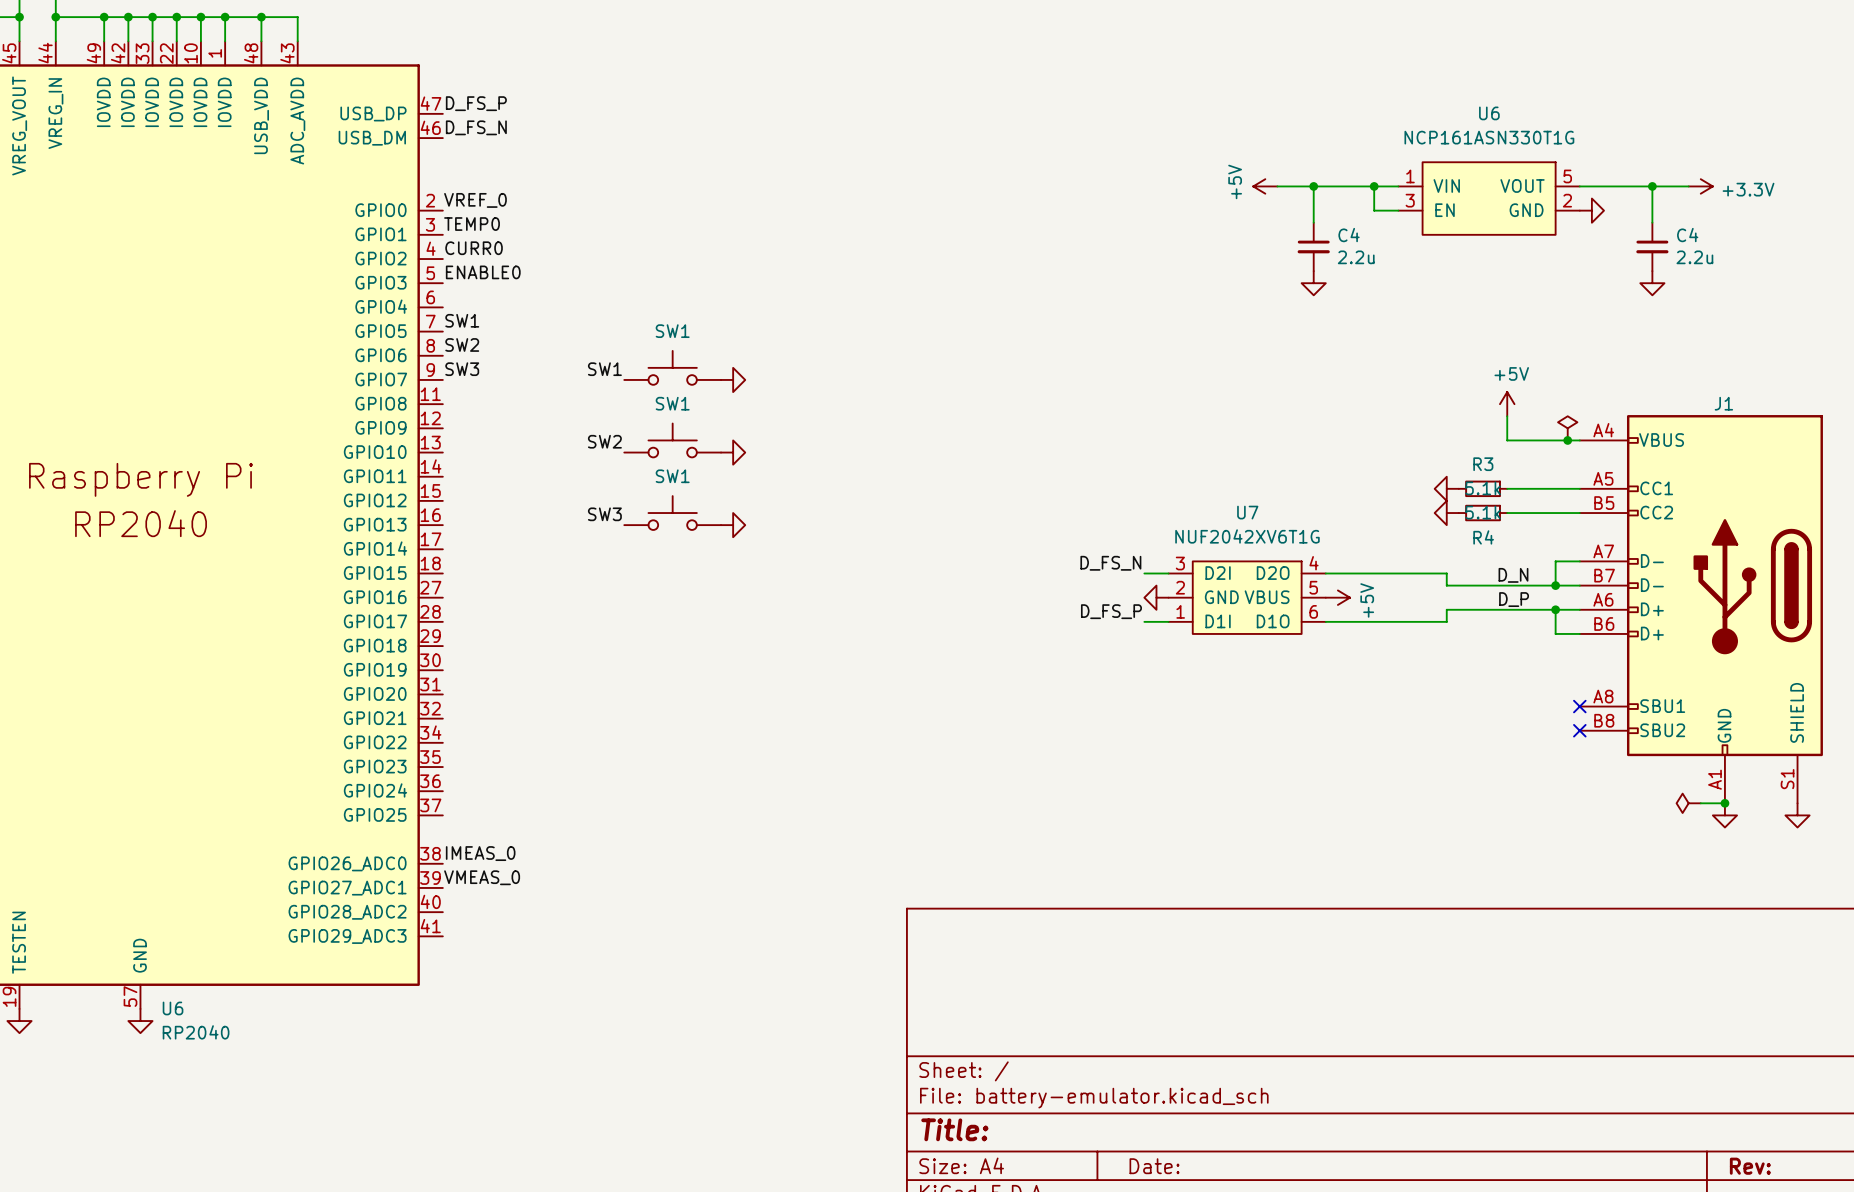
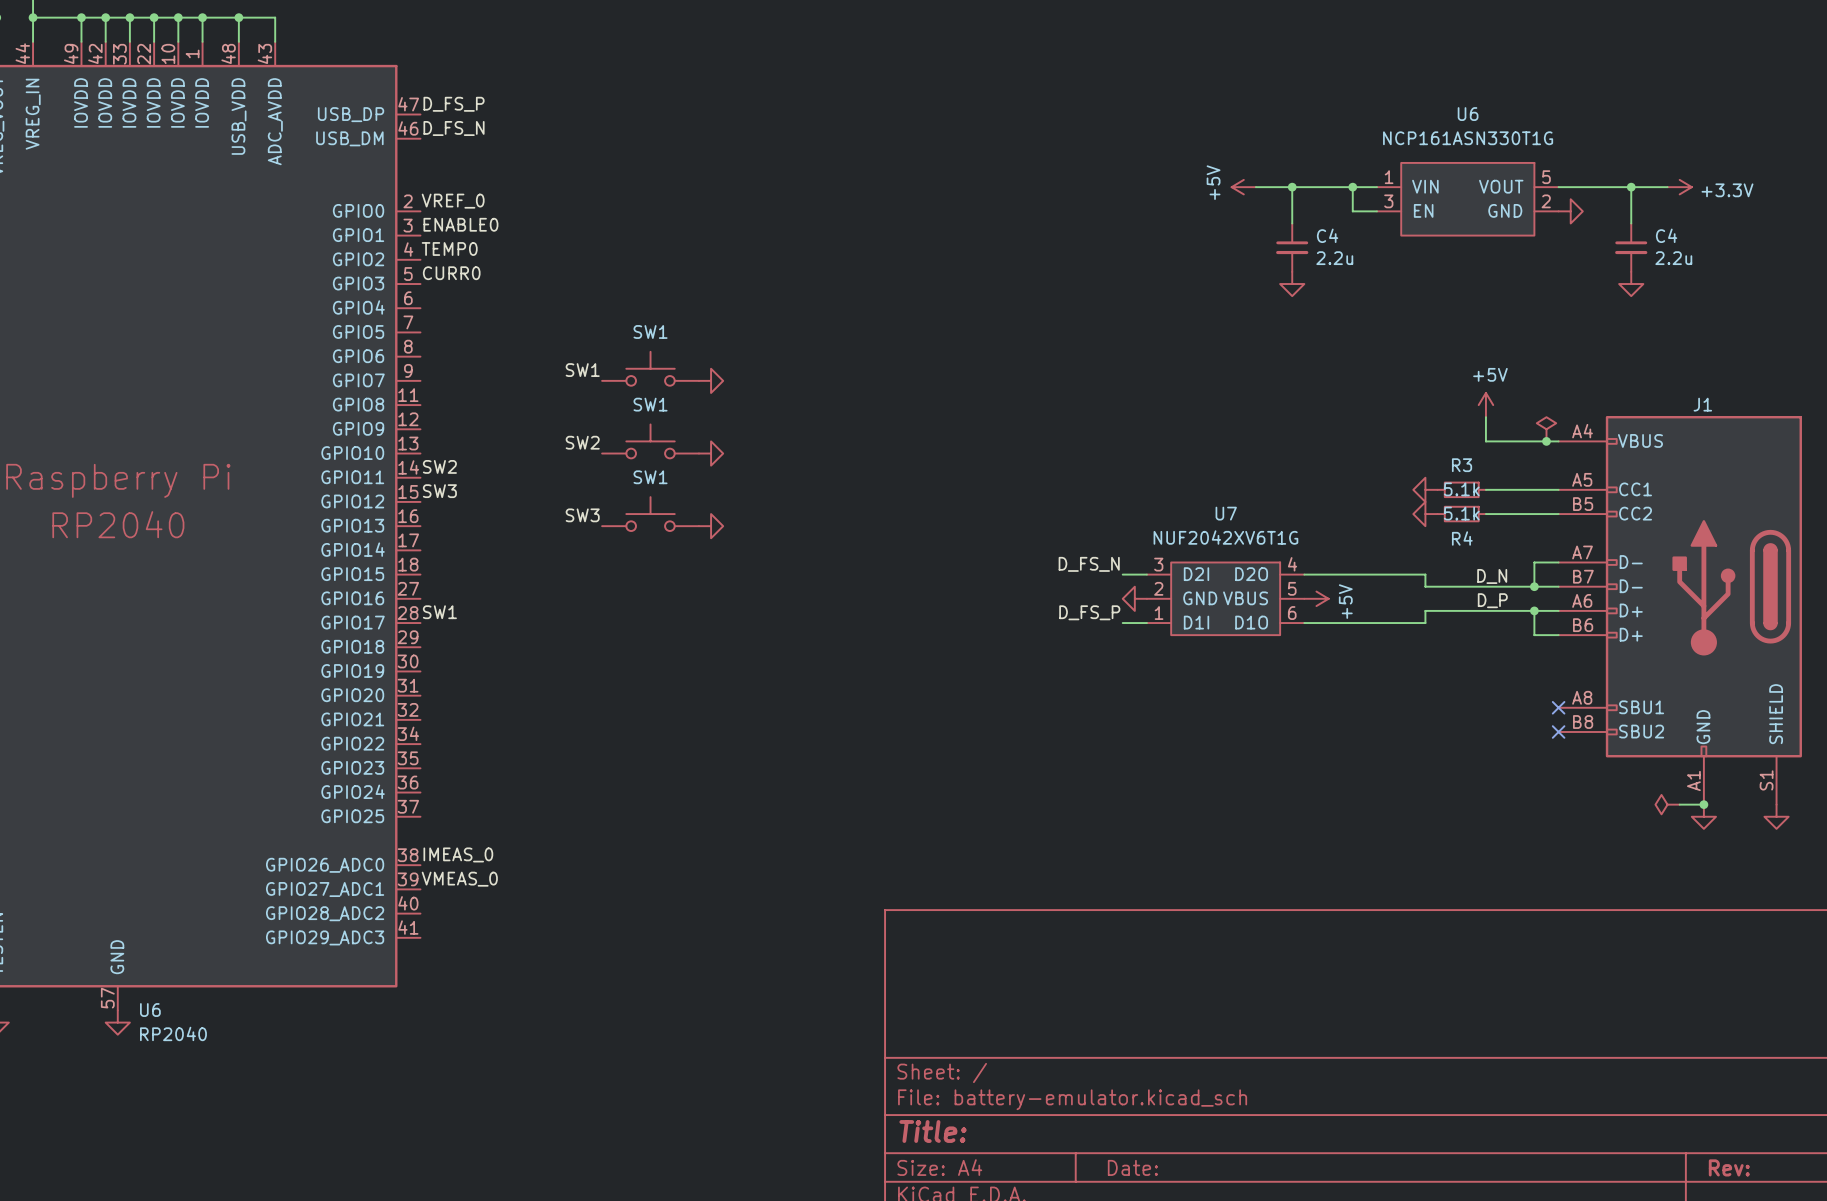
label: TEMP0 (472, 224) -> ENABLE0 (460, 224)
label: CURR0 (474, 248) -> TEMP0 (449, 248)
label: ENABLE0 (483, 272) -> CURR0 (451, 273)
label: SW1 (462, 320) -> none
label position: SW2 (462, 344) -> SW2 (439, 466)
label position: SW3 (462, 369) -> SW3 (439, 491)
label: none -> SW1 (439, 612)

